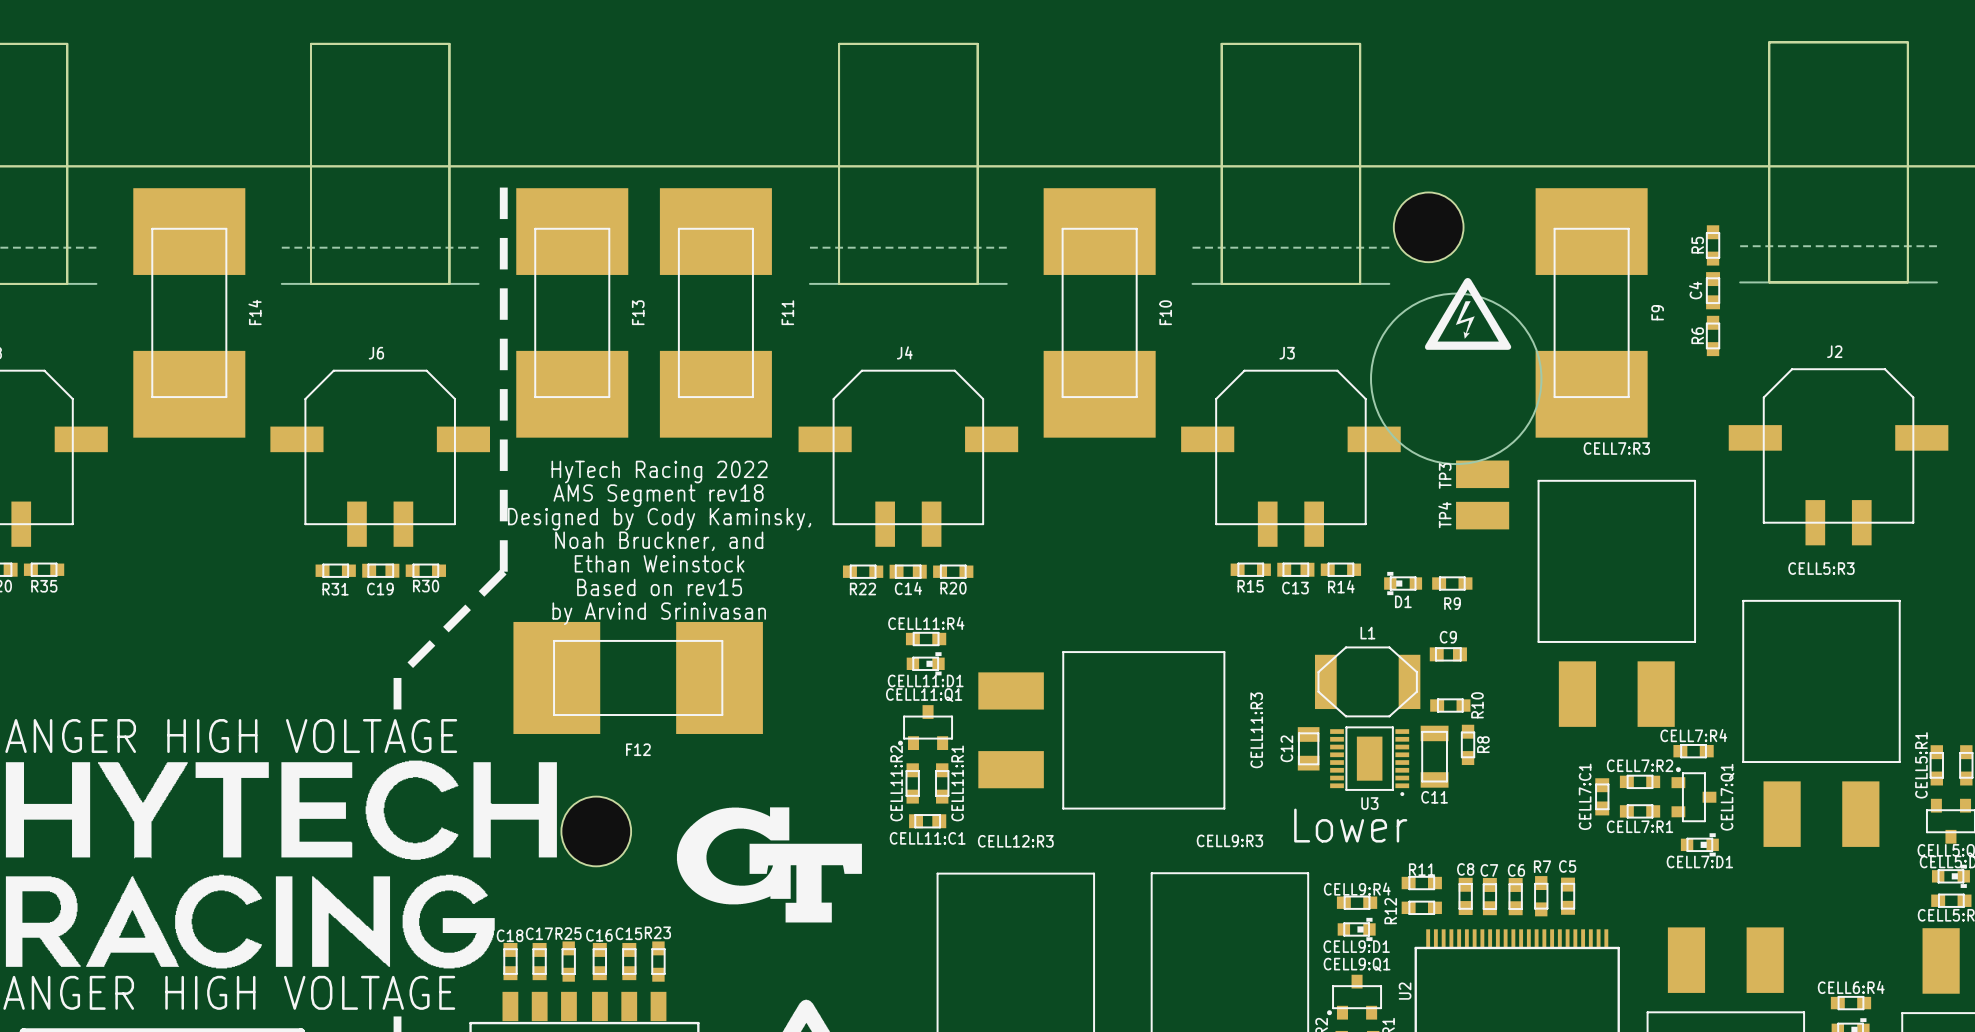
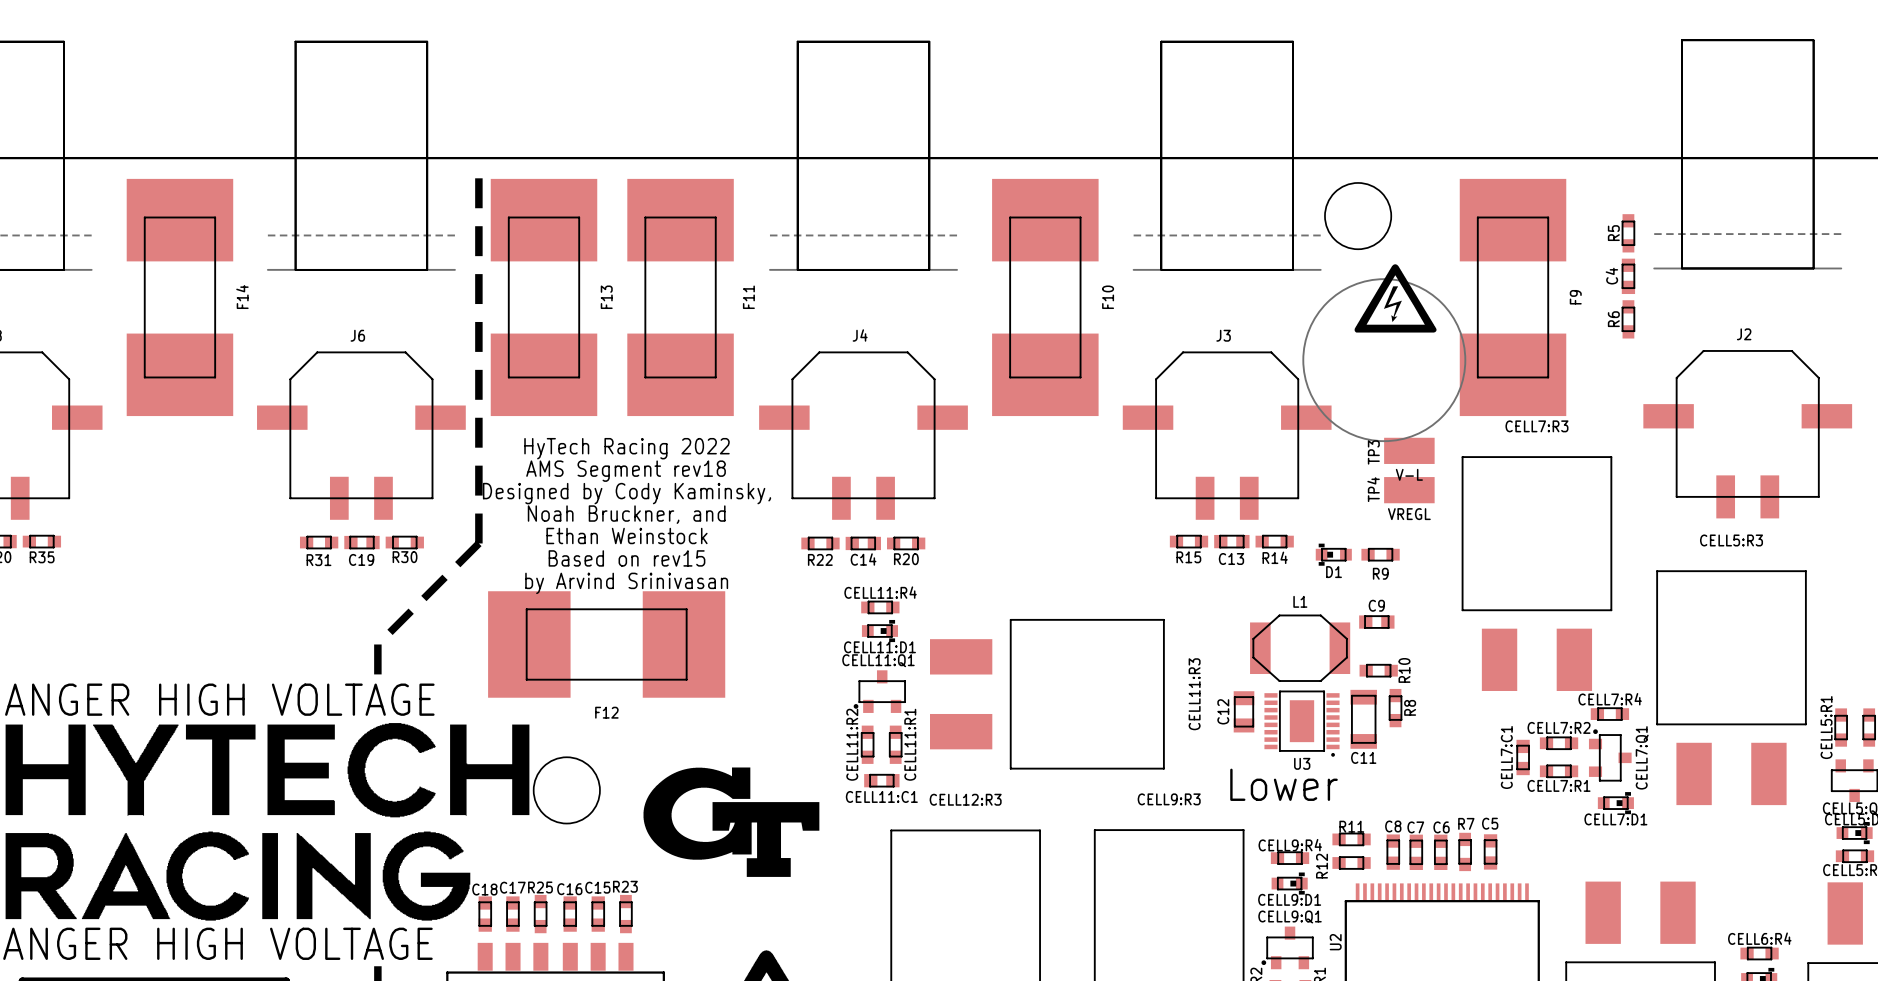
TP3 text: none -> V-L (1409, 474)
TP4 text: none -> VREGL (1409, 514)

